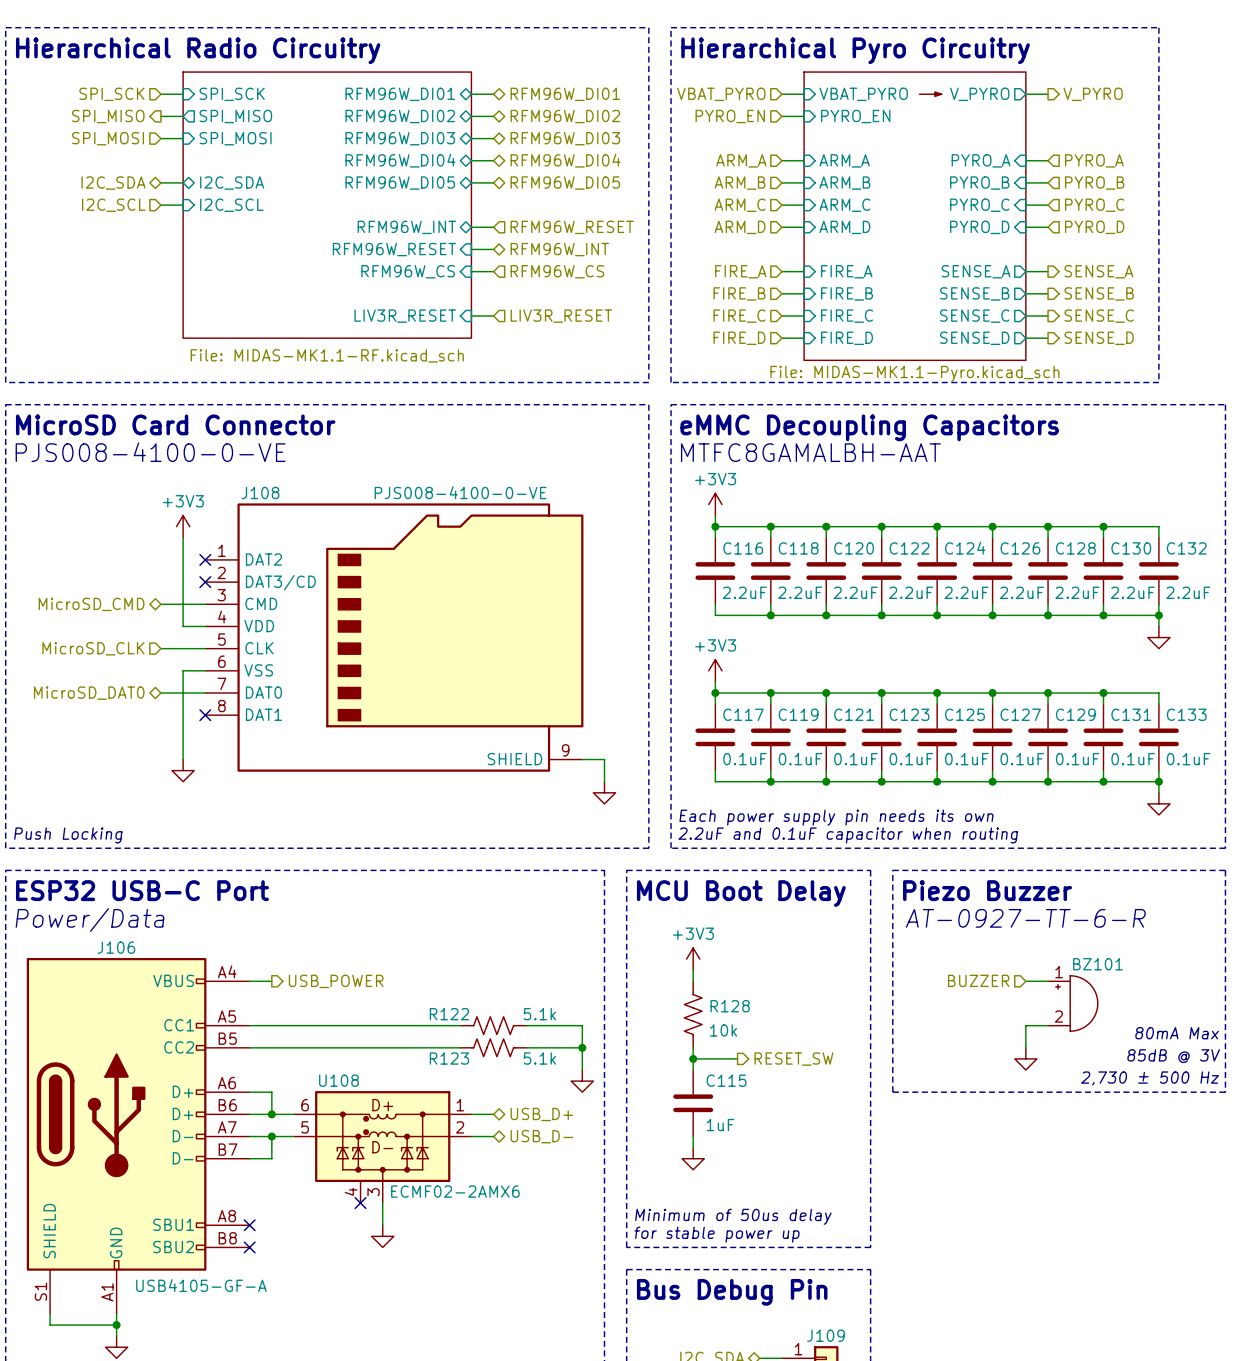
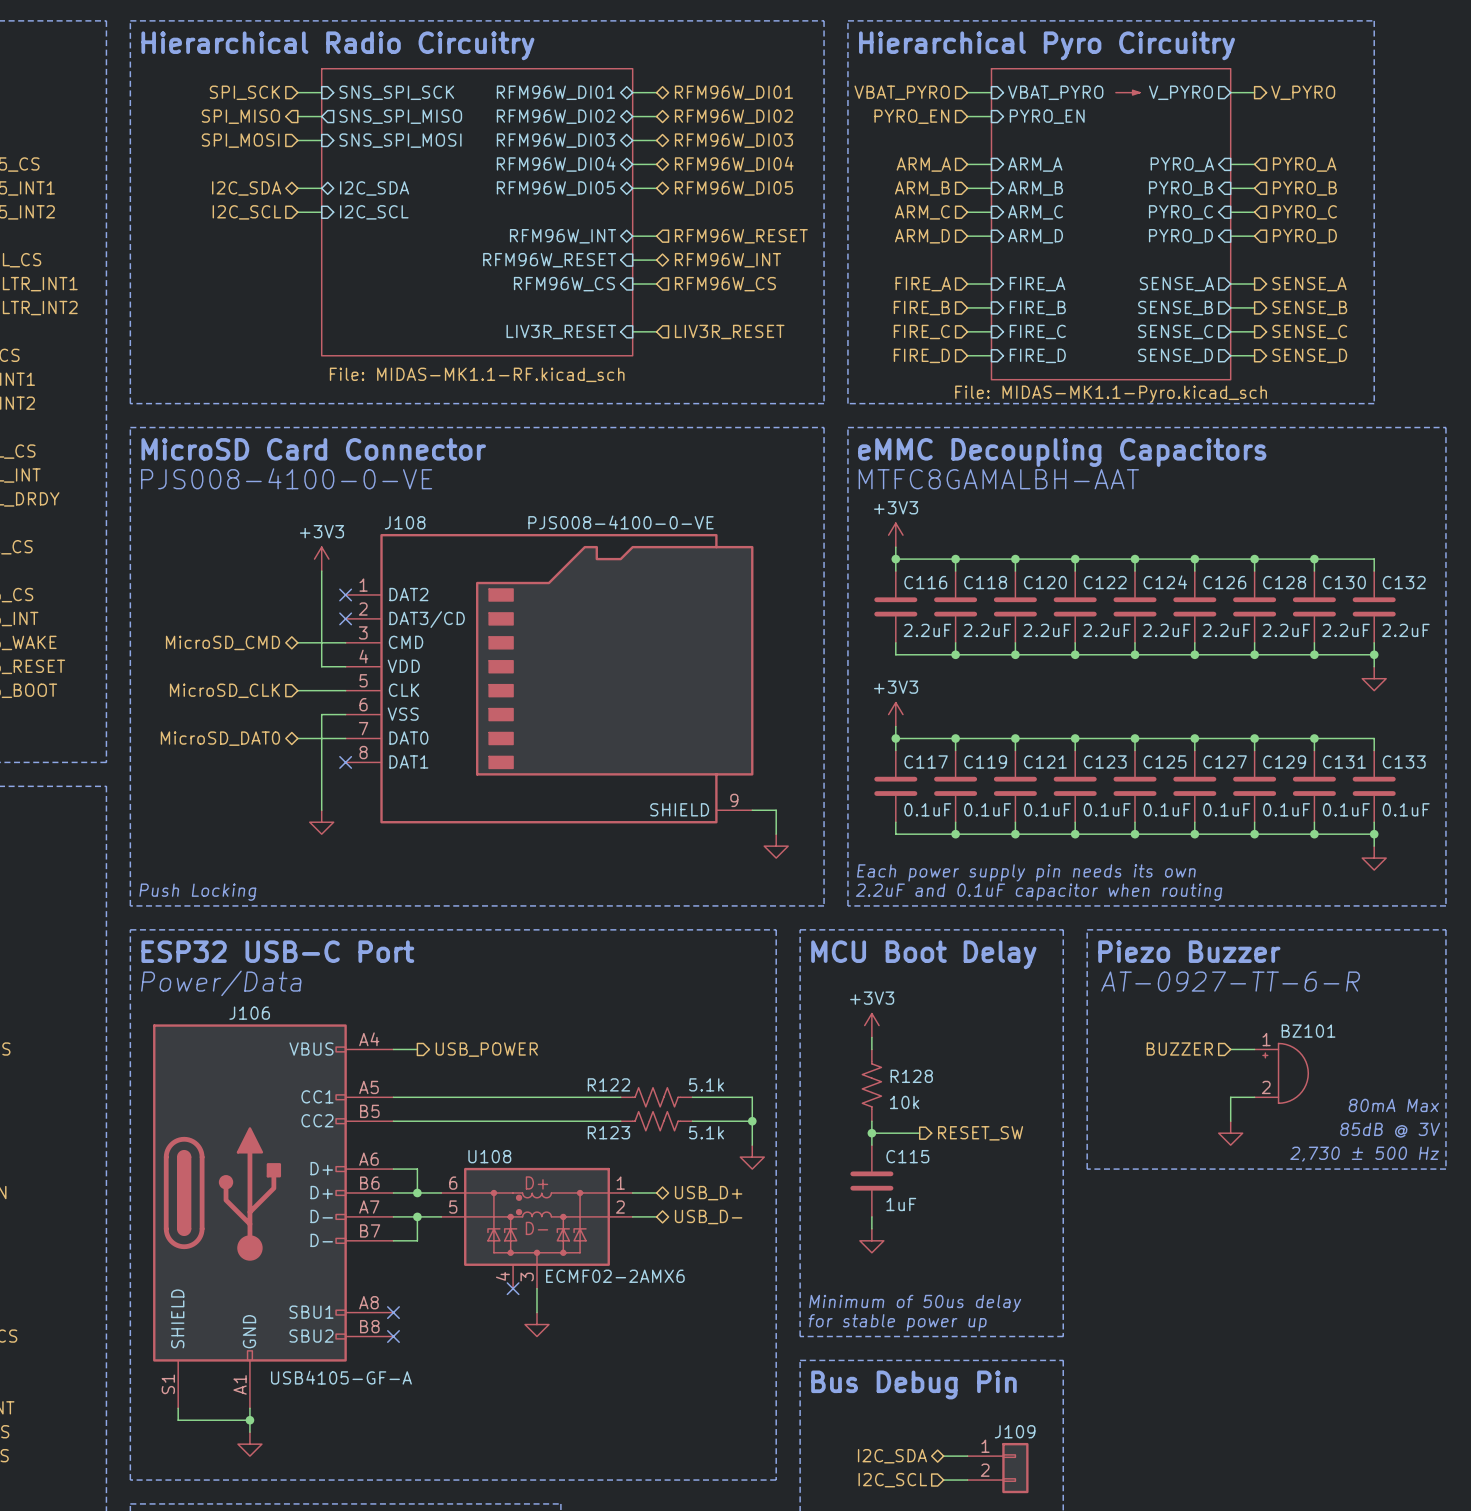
sheet pin: SPI_SCK (232, 94) -> SNS_SPI_SCK (396, 92)
sheet pin: SPI_MISO (235, 116) -> SNS_SPI_MISO (400, 116)
sheet pin: SPI_MOSI (235, 138) -> SNS_SPI_MOSI (400, 140)

